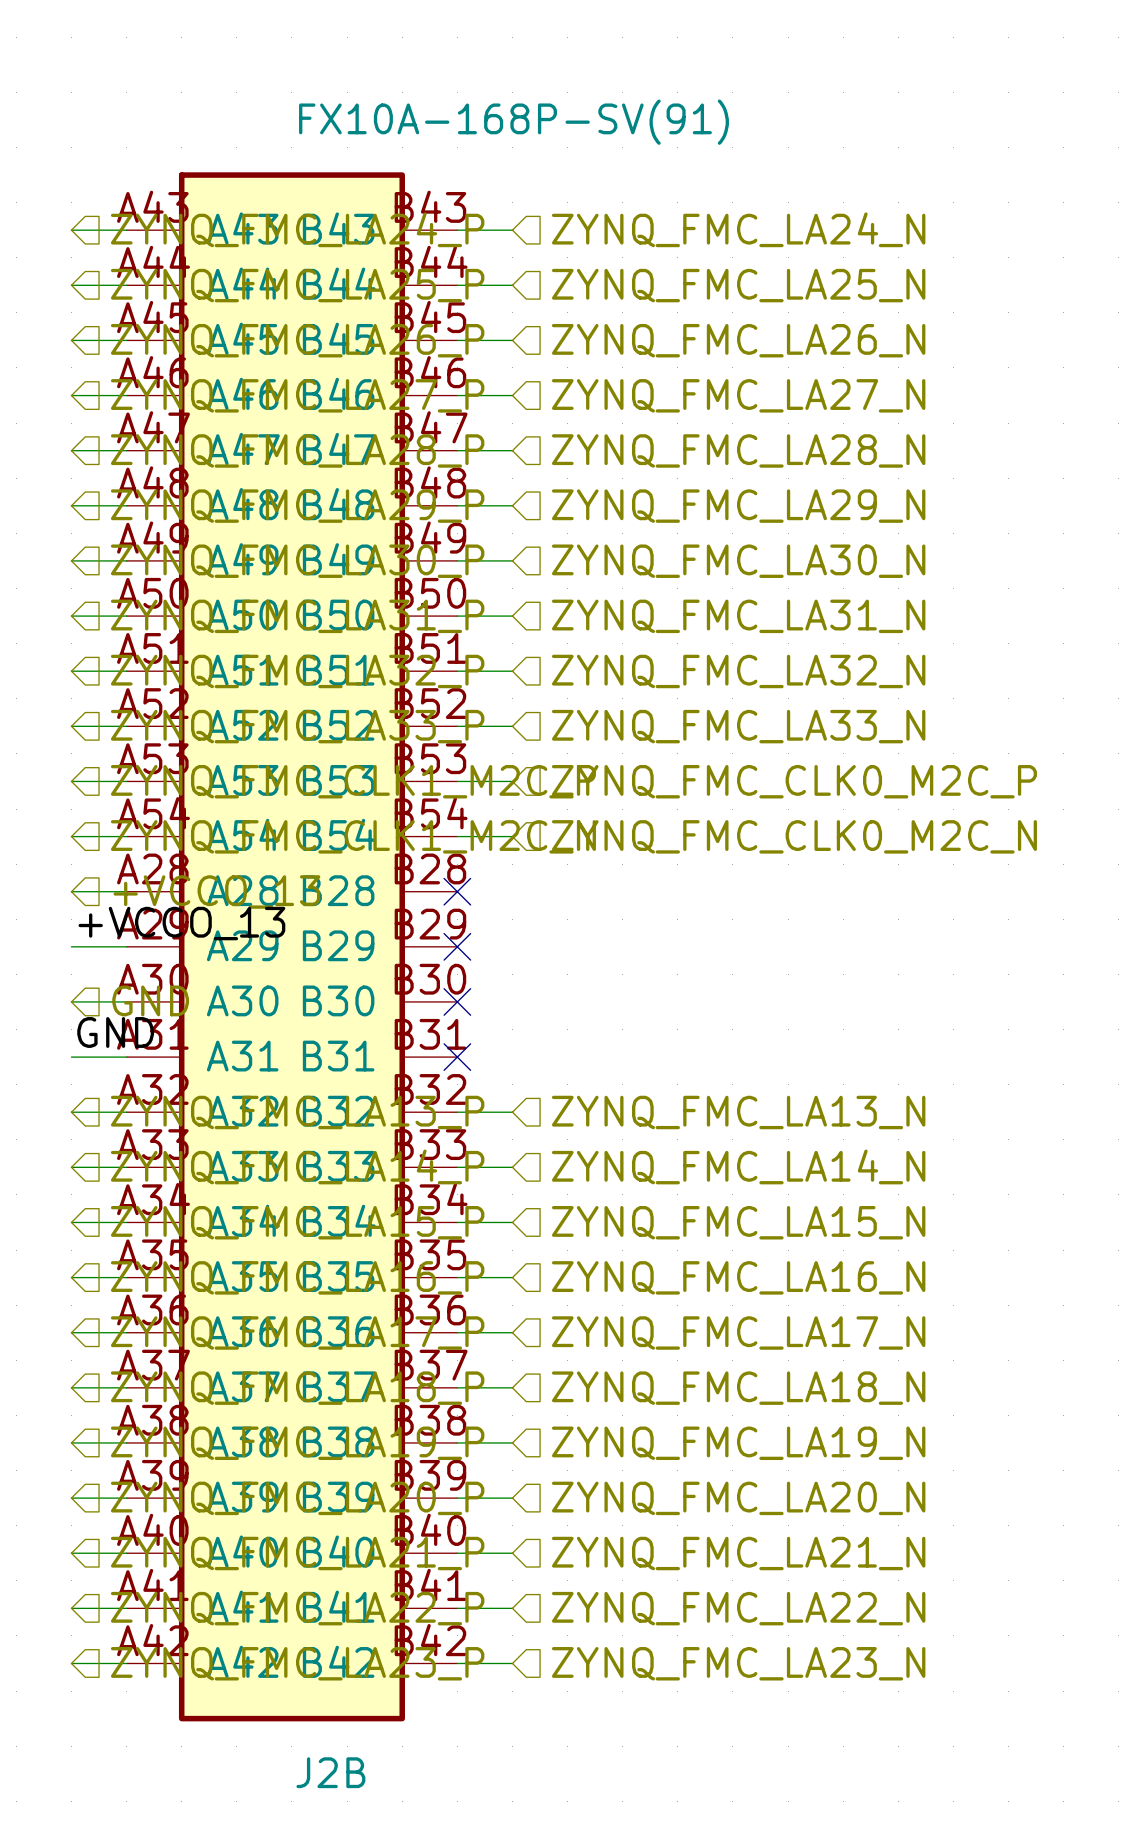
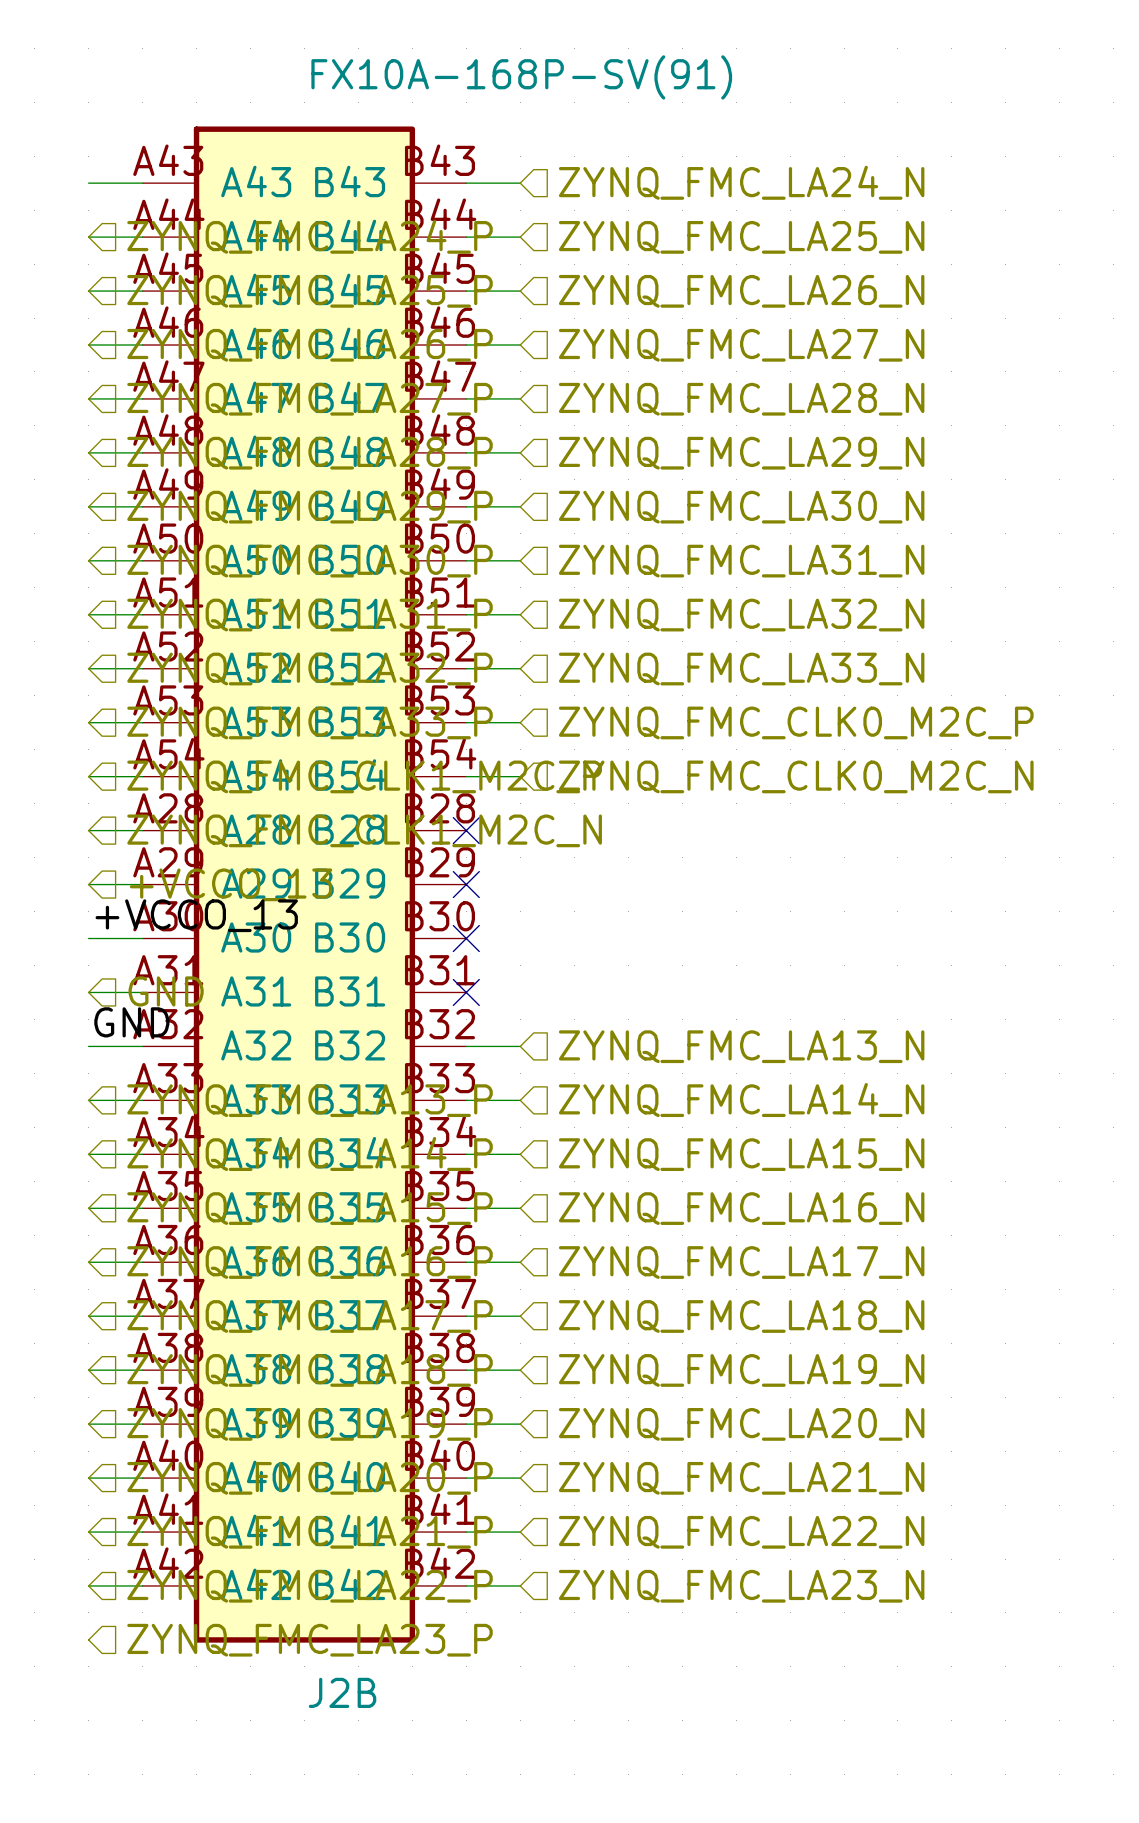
hierarchical label: none -> ZYNQ_FMC_LA24_N (741, 182)
wire: none -> (88, 183) (142, 183)
wire: none -> (466, 183) (520, 183)
hierarchical label: ZYNQ_FMC_LA24_N (738, 229) -> ZYNQ_FMC_LA25_N (741, 237)
hierarchical label: ZYNQ_FMC_LA25_N (738, 285) -> ZYNQ_FMC_LA26_N (741, 291)
hierarchical label: ZYNQ_FMC_LA26_N (738, 340) -> ZYNQ_FMC_LA27_N (741, 345)
hierarchical label: ZYNQ_FMC_LA27_N (738, 395) -> ZYNQ_FMC_LA28_N (741, 399)
hierarchical label: ZYNQ_FMC_LA28_N (738, 450) -> ZYNQ_FMC_LA29_N (741, 453)
hierarchical label: ZYNQ_FMC_LA29_N (738, 506) -> ZYNQ_FMC_LA30_N (741, 507)
hierarchical label: ZYNQ_FMC_LA30_N (738, 561) -> ZYNQ_FMC_LA31_N (741, 561)
hierarchical label: ZYNQ_FMC_LA31_N (738, 616) -> ZYNQ_FMC_LA32_N (741, 615)
hierarchical label: ZYNQ_FMC_LA32_N (738, 671) -> ZYNQ_FMC_LA33_N (741, 669)
hierarchical label: ZYNQ_FMC_LA33_N (738, 726) -> ZYNQ_FMC_CLK0_M2C_P (796, 722)
hierarchical label: ZYNQ_FMC_CLK0_M2C_P (794, 781) -> ZYNQ_FMC_CLK0_M2C_N (796, 776)
wire: (457, 836) (512, 836) -> (466, 1046) (520, 1046)
no-connect mark: none -> (466, 830)
hierarchical label: ZYNQ_FMC_CLK0_M2C_N (794, 836) -> none
J2B position: (291, 946) -> (304, 884)
no-connect mark: (457, 1057) -> none
hierarchical label: none -> ZYNQ_FMC_LA13_N (741, 1046)
hierarchical label: ZYNQ_FMC_LA13_N (738, 1112) -> ZYNQ_FMC_LA14_N (741, 1100)
hierarchical label: ZYNQ_FMC_LA14_N (738, 1166) -> ZYNQ_FMC_LA15_N (741, 1154)
hierarchical label: ZYNQ_FMC_LA15_N (738, 1222) -> ZYNQ_FMC_LA16_N (741, 1208)
hierarchical label: ZYNQ_FMC_LA16_N (738, 1277) -> ZYNQ_FMC_LA17_N (741, 1262)
hierarchical label: ZYNQ_FMC_LA17_N (738, 1333) -> ZYNQ_FMC_LA18_N (741, 1316)
hierarchical label: ZYNQ_FMC_LA18_N (738, 1388) -> ZYNQ_FMC_LA19_N (741, 1370)
hierarchical label: ZYNQ_FMC_LA19_N (738, 1443) -> ZYNQ_FMC_LA20_N (741, 1424)
hierarchical label: ZYNQ_FMC_LA20_N (738, 1498) -> ZYNQ_FMC_LA21_N (741, 1478)
hierarchical label: ZYNQ_FMC_LA21_N (738, 1553) -> ZYNQ_FMC_LA22_N (741, 1532)
hierarchical label: ZYNQ_FMC_LA22_N (738, 1608) -> ZYNQ_FMC_LA23_N (741, 1586)
wire: (71, 1663) (126, 1663) -> none
wire: (457, 1663) (512, 1663) -> none
hierarchical label: ZYNQ_FMC_LA23_N (738, 1663) -> none

